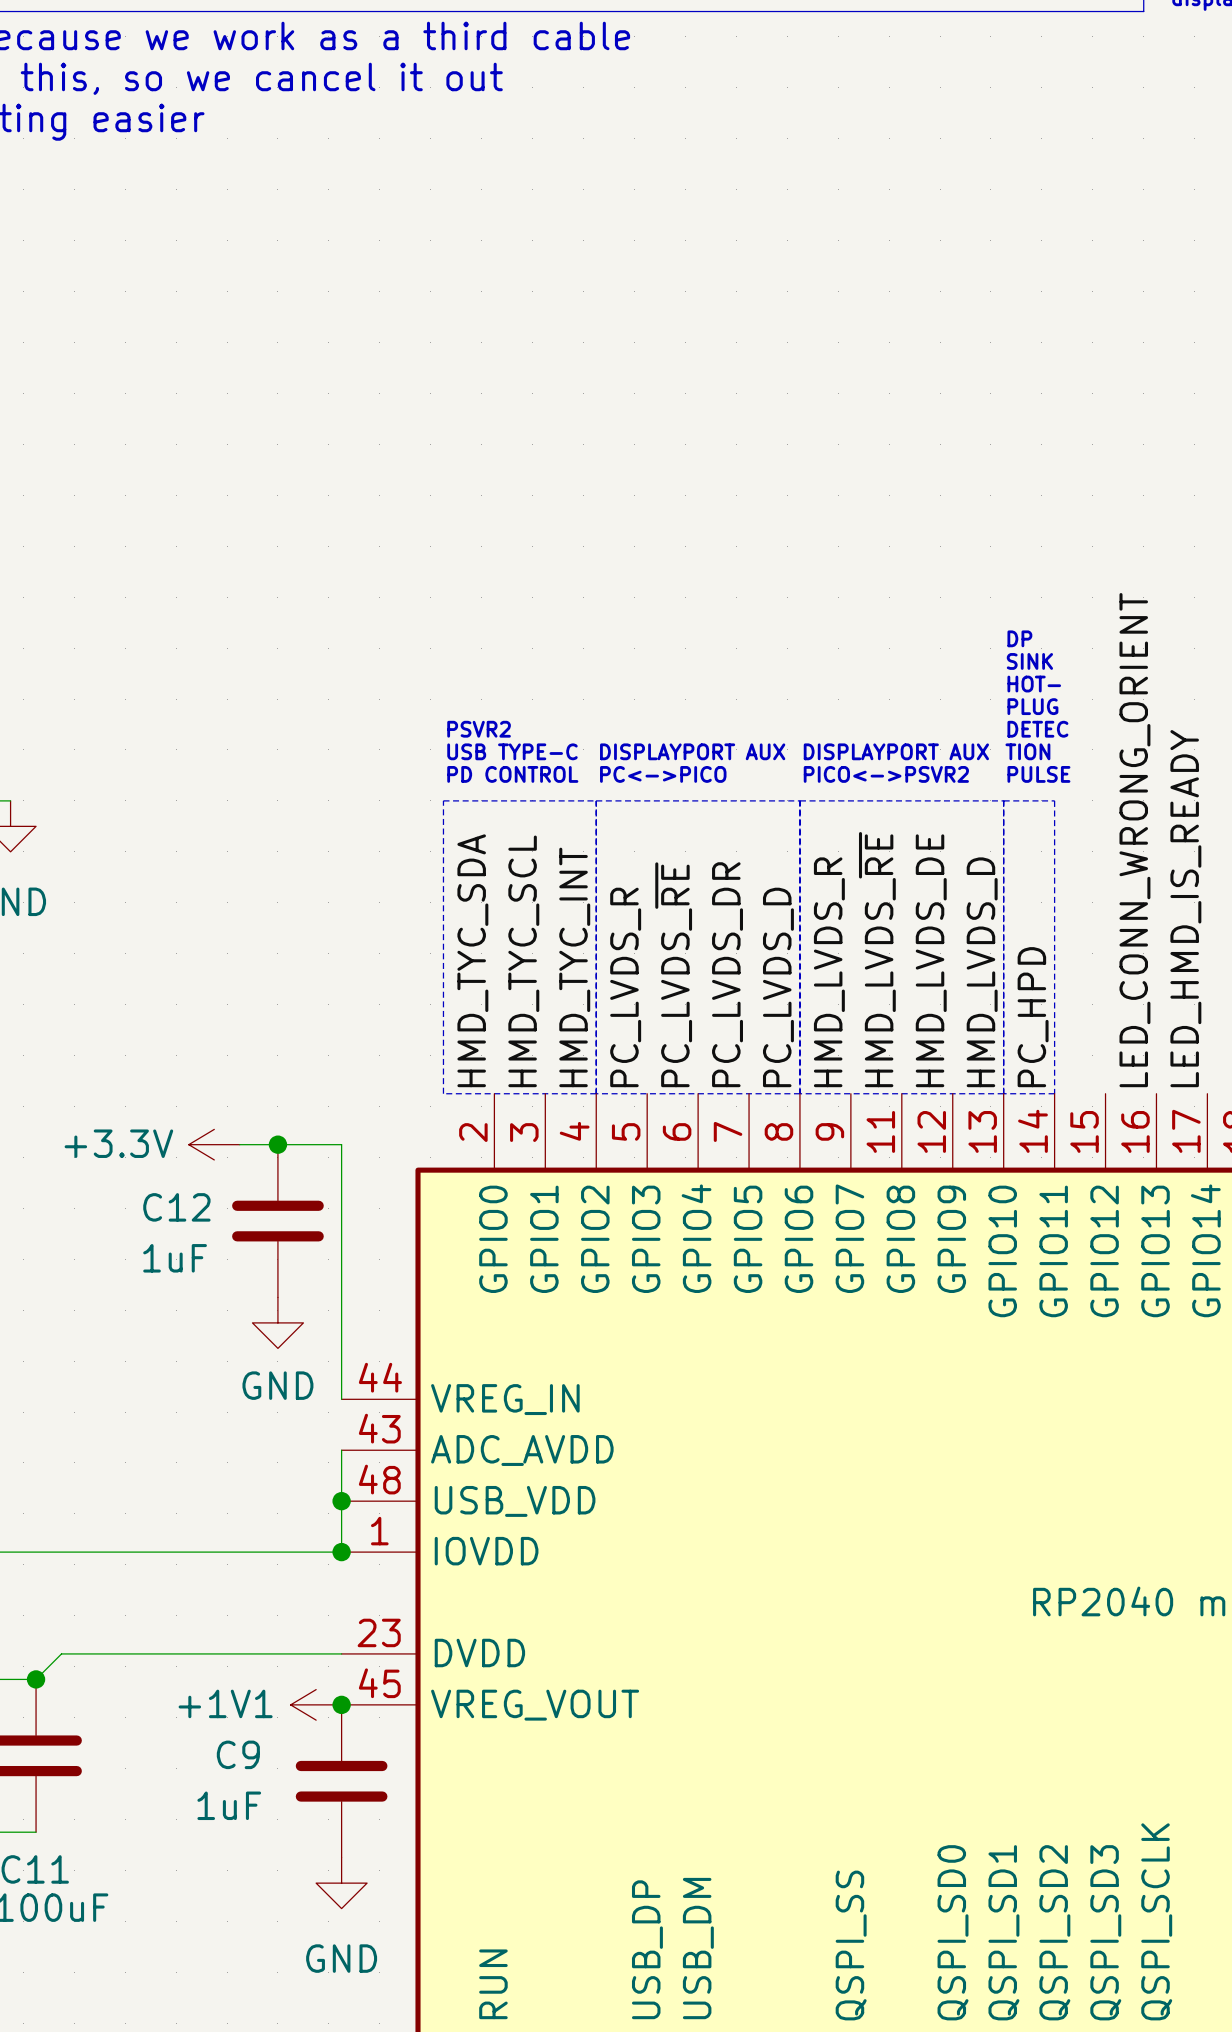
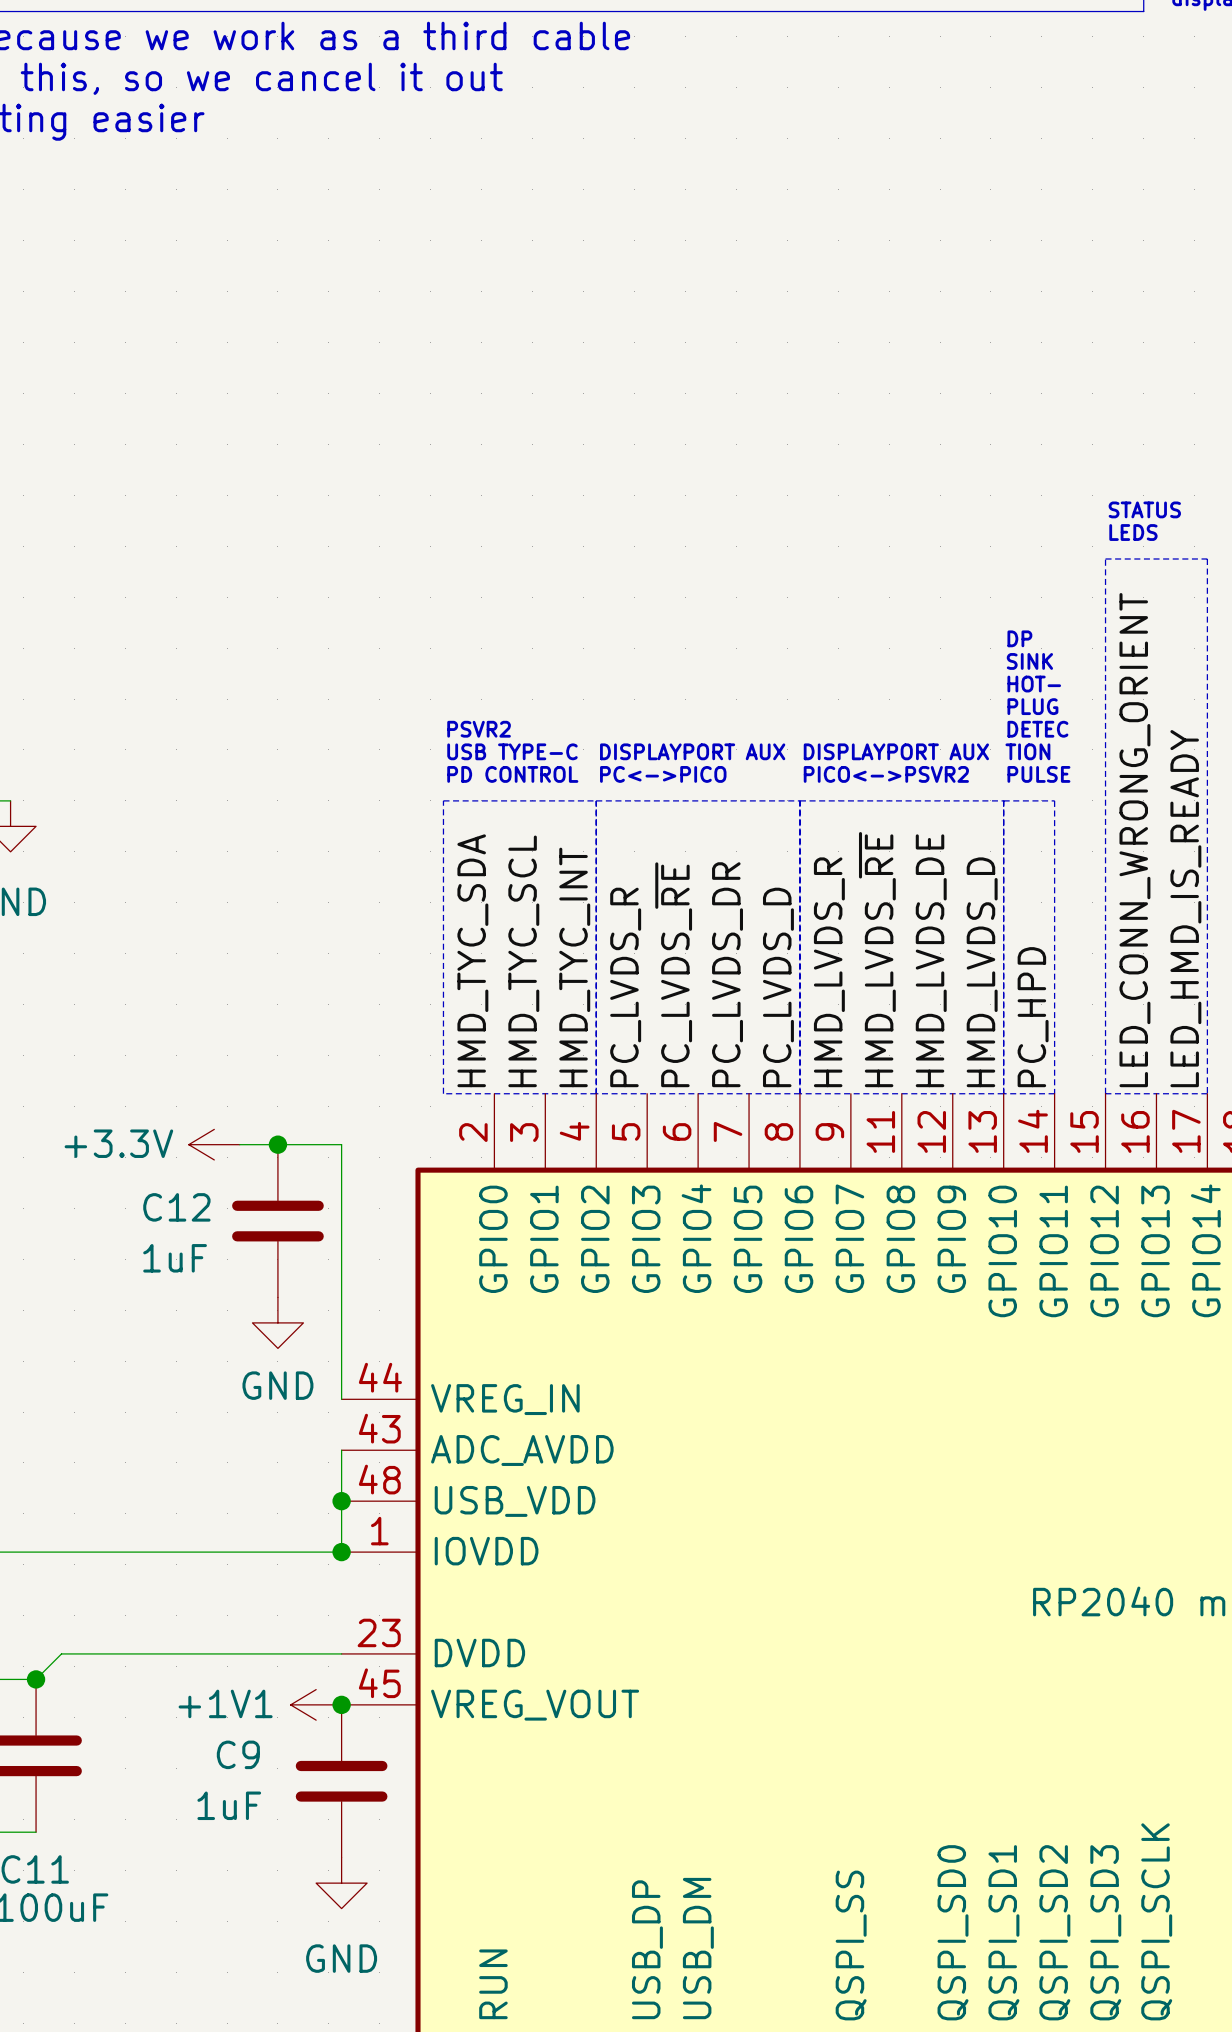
text: none -> STATUS (1144, 509)
text: none -> LEDS (1133, 532)
line: none -> (1105, 558) (1207, 558) (1207, 1093) (1105, 1093) (1105, 558)

